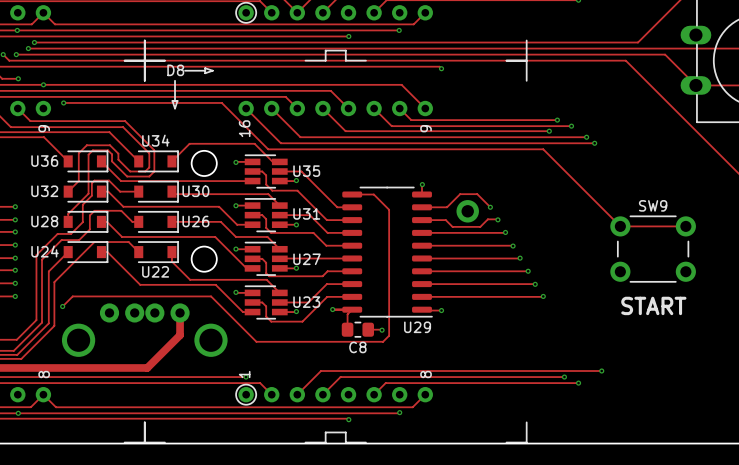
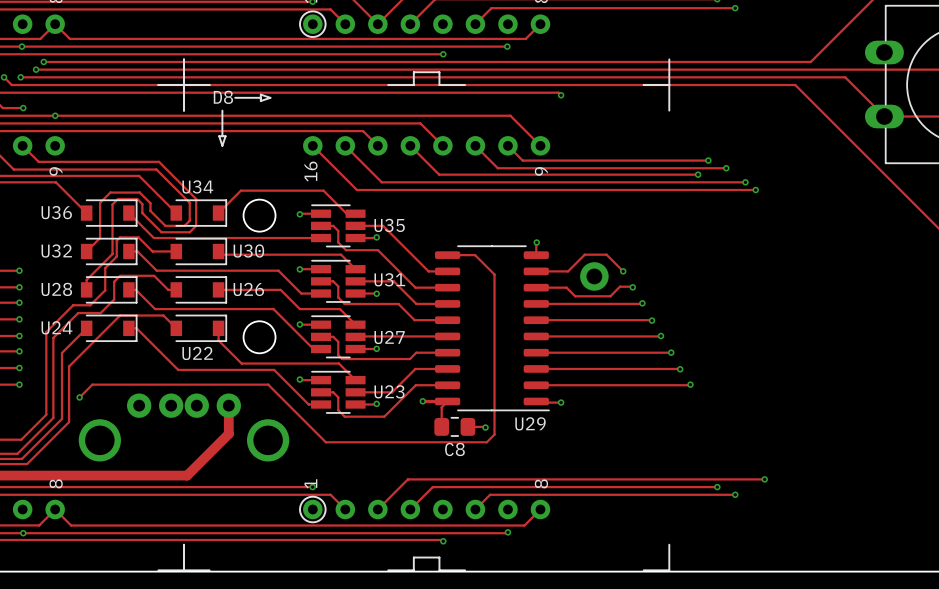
track: (63, 102) (221, 102) (268, 149) (543, 149) (620, 226) (685, 226) -> none
via: (63, 102) -> none
SW9: (653, 249) -> none
text: START (653, 305) -> none

